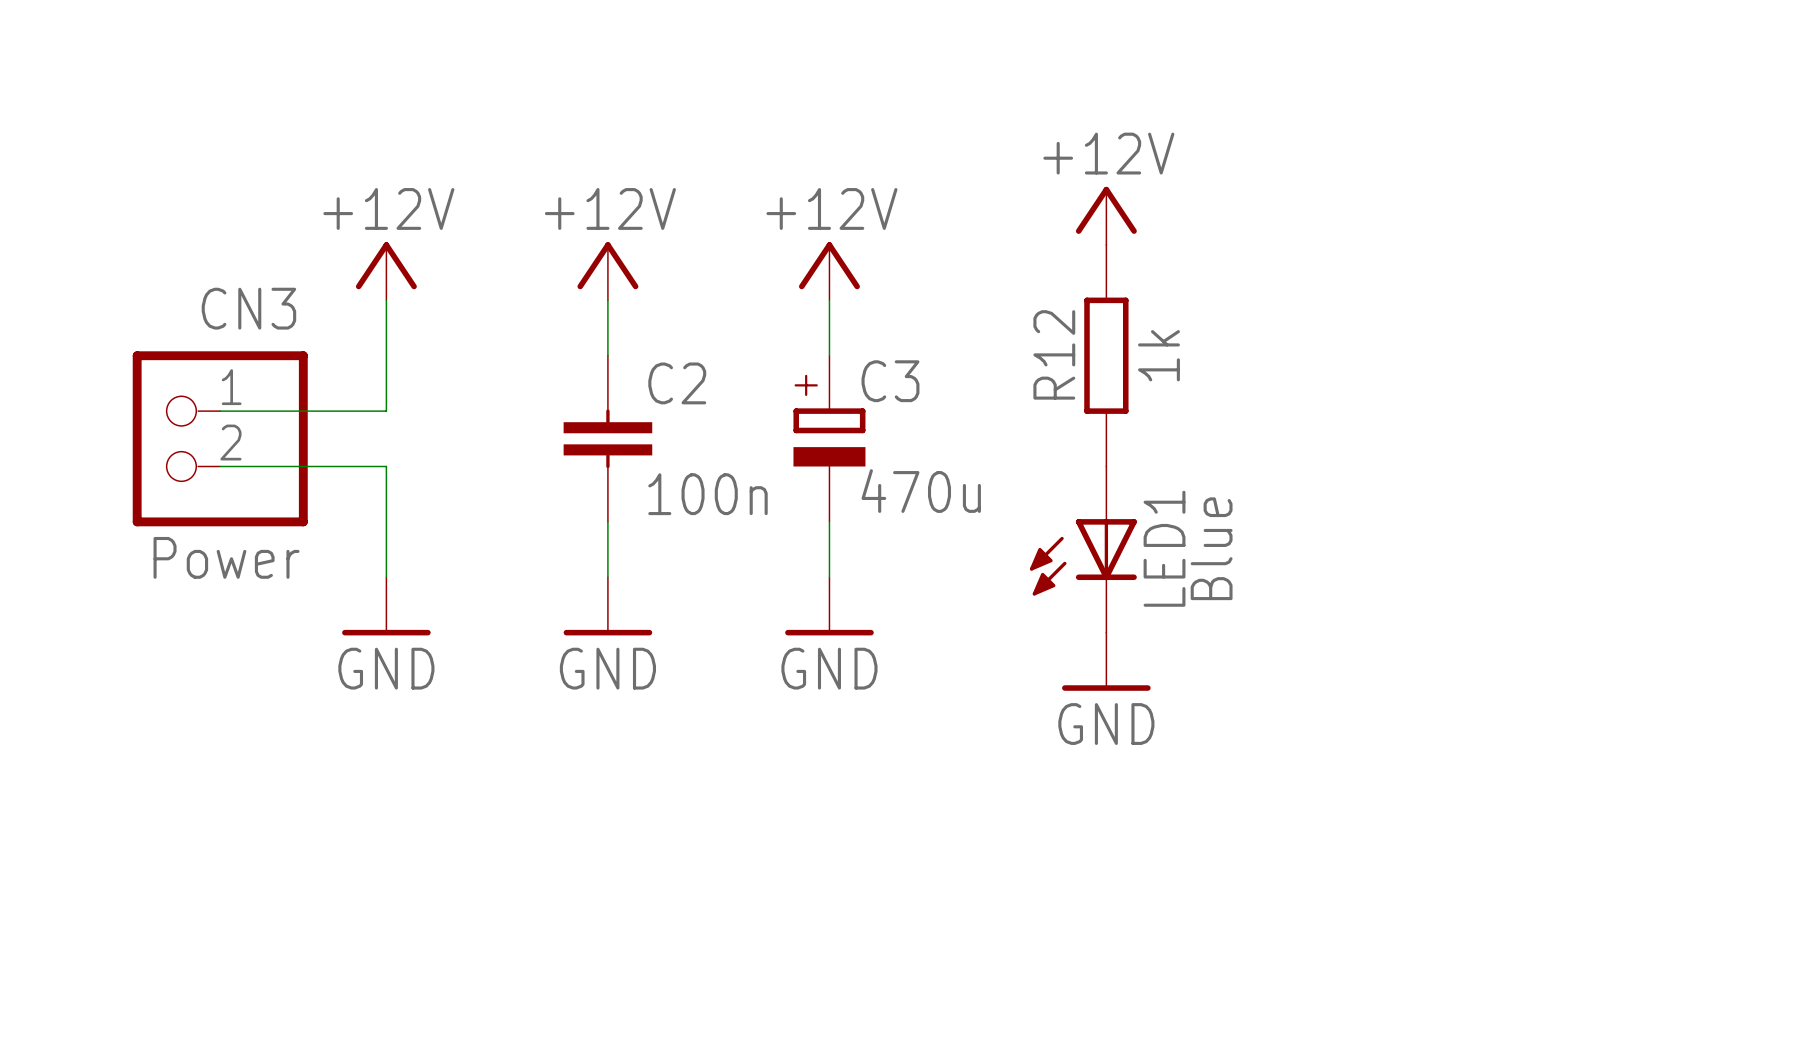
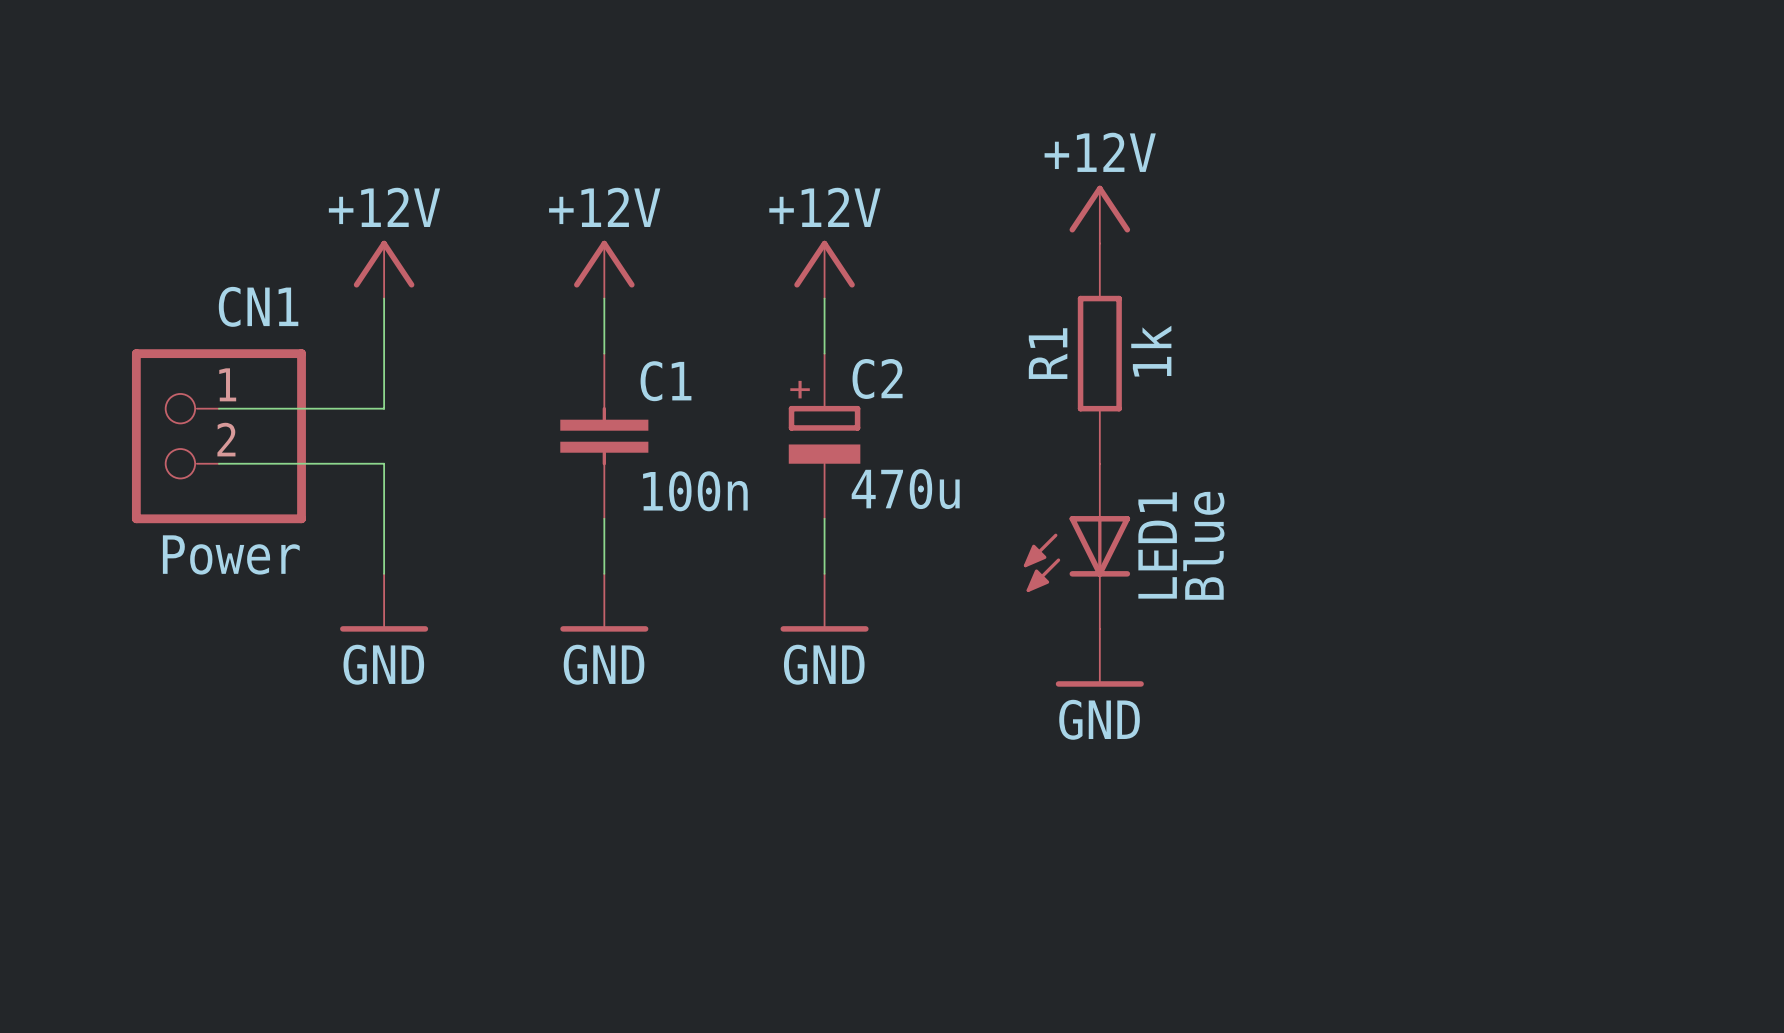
CN3 name: CN3 (248, 308) -> CN1 (258, 306)
R12 name: R12 (1054, 354) -> R1 (1048, 353)
C3 name: C3 (890, 381) -> C2 (877, 378)
C2 name: C2 (677, 383) -> C1 (666, 381)

